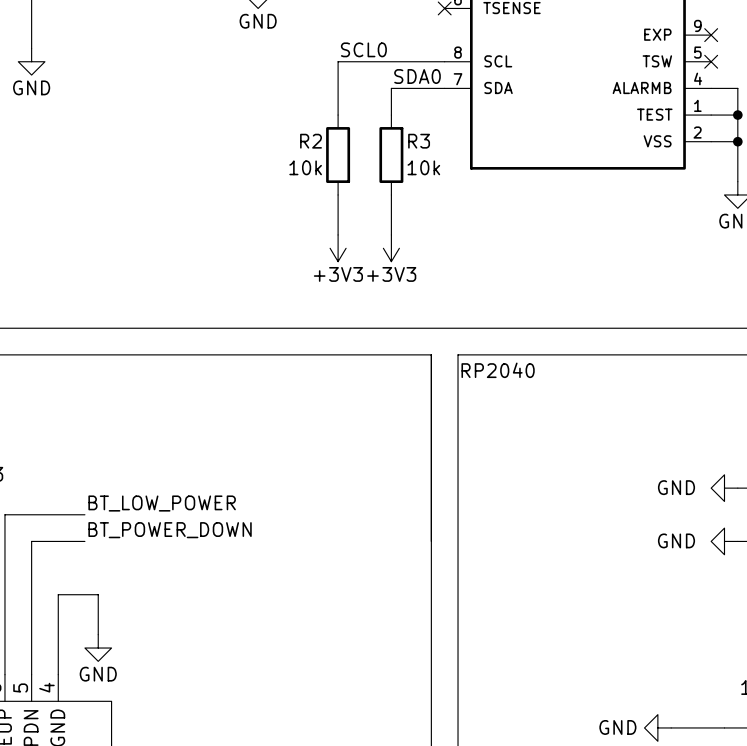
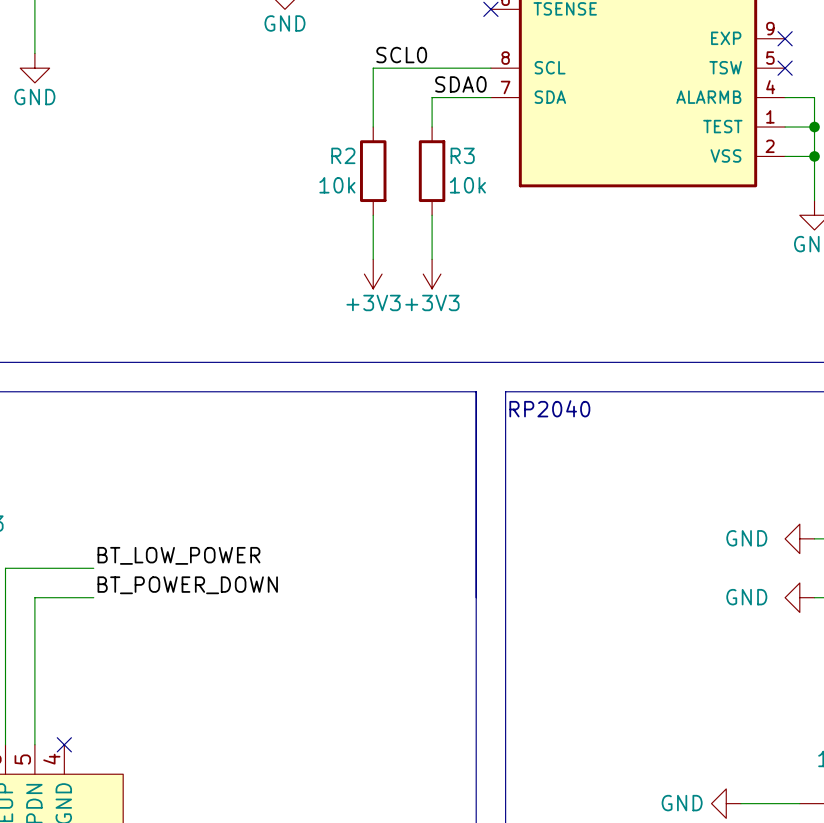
wire: (98, 634) (98, 594) (58, 594) (58, 674) -> none
power symbol: GND (98, 648) -> none
no-connect mark: none -> (64, 744)

